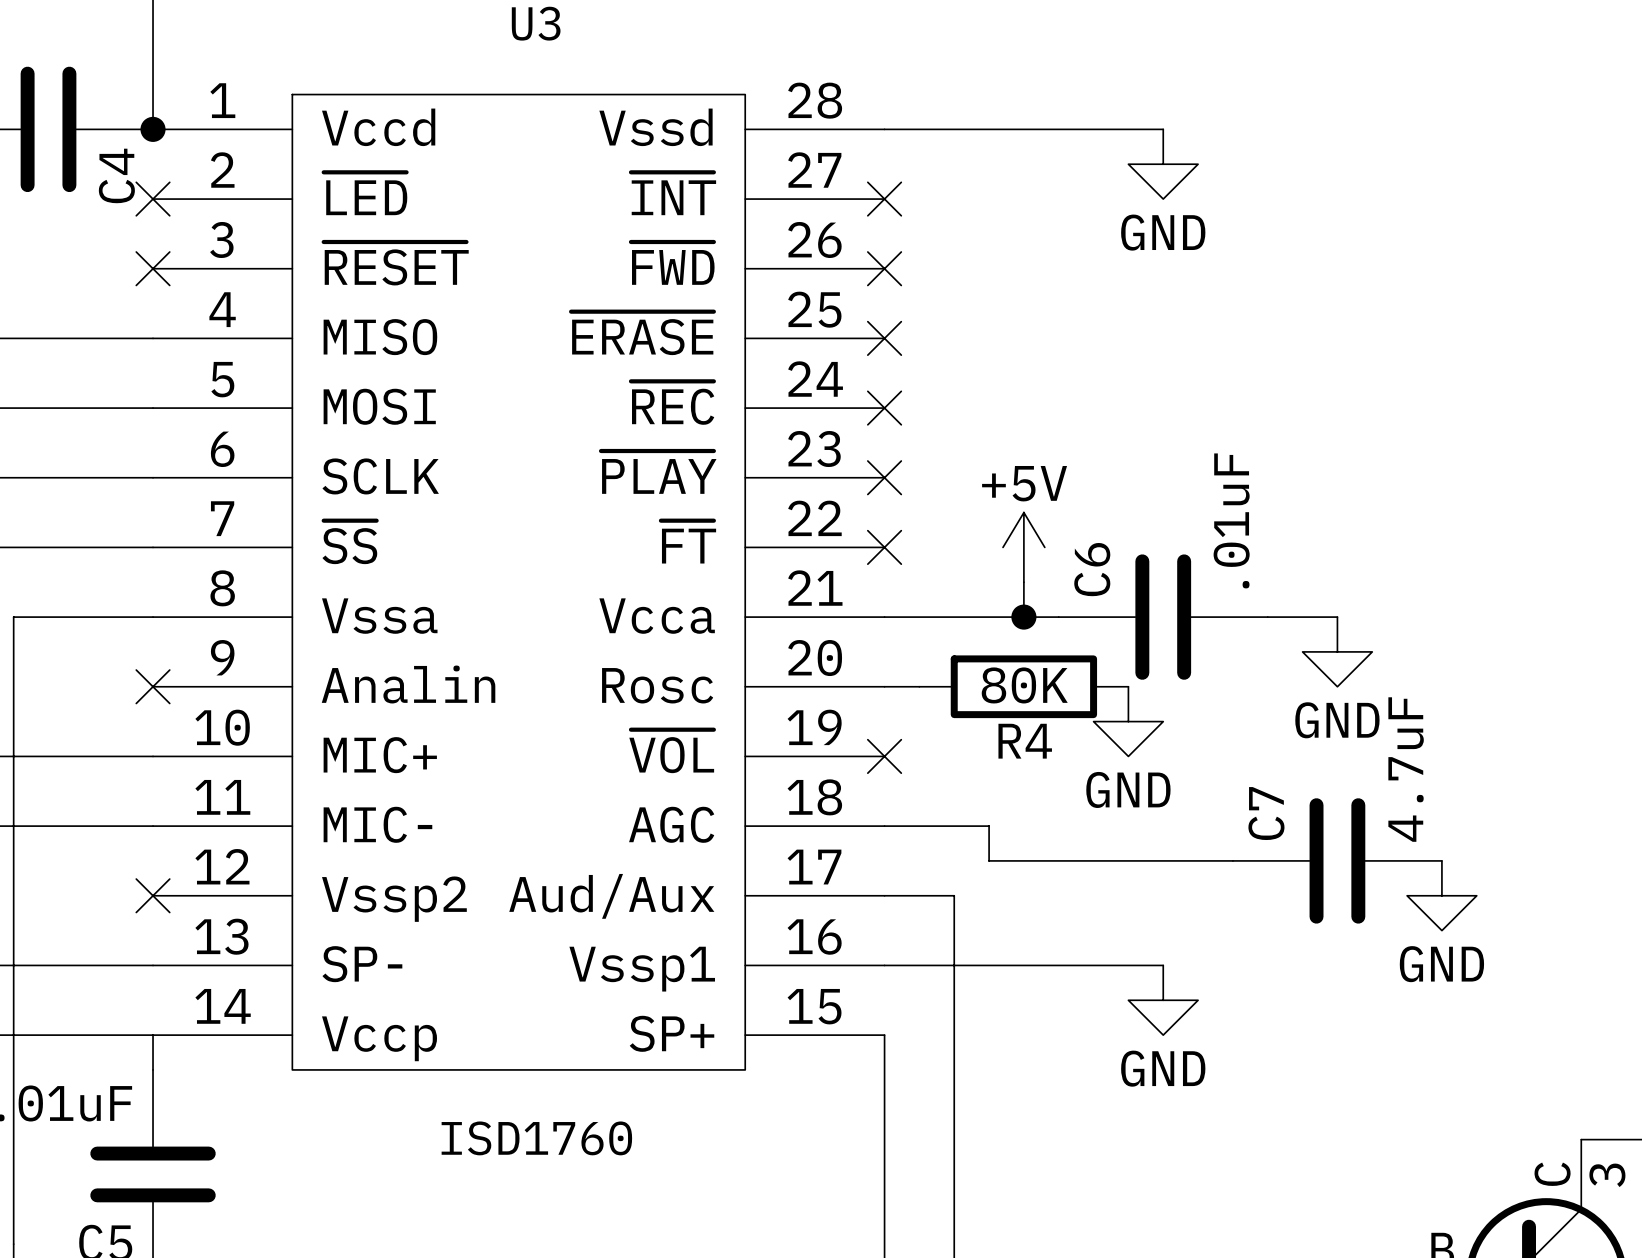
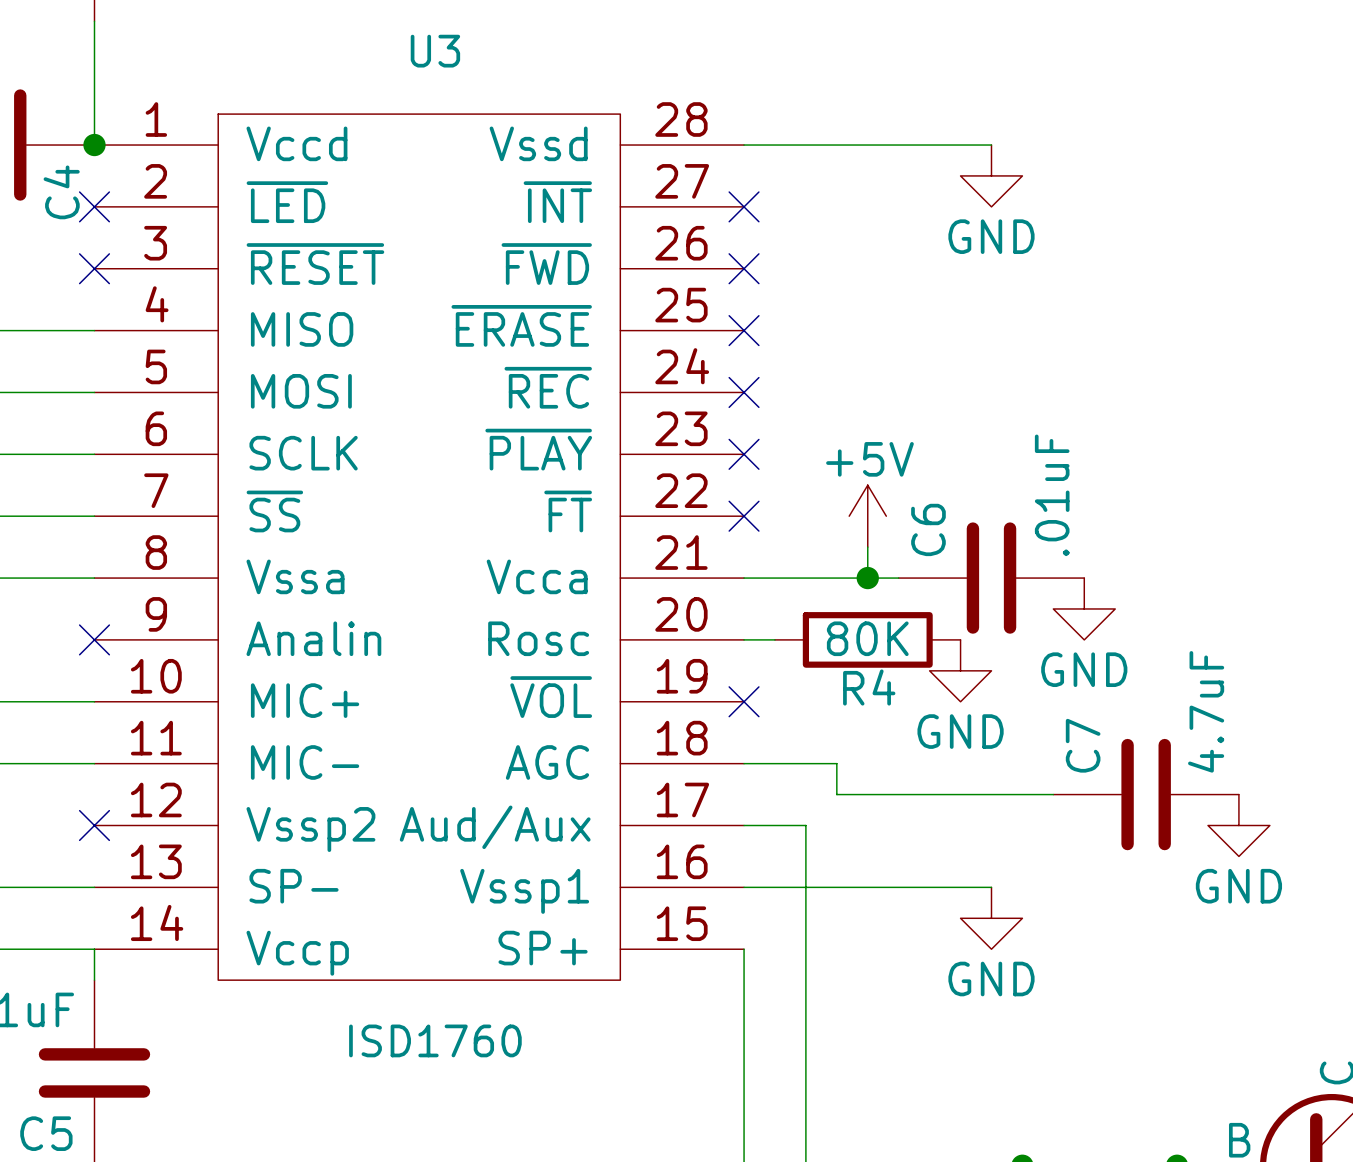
wire: (1267, 617) (1337, 617) -> none
power symbol position: GND (1337, 651) -> GND (1084, 608)

